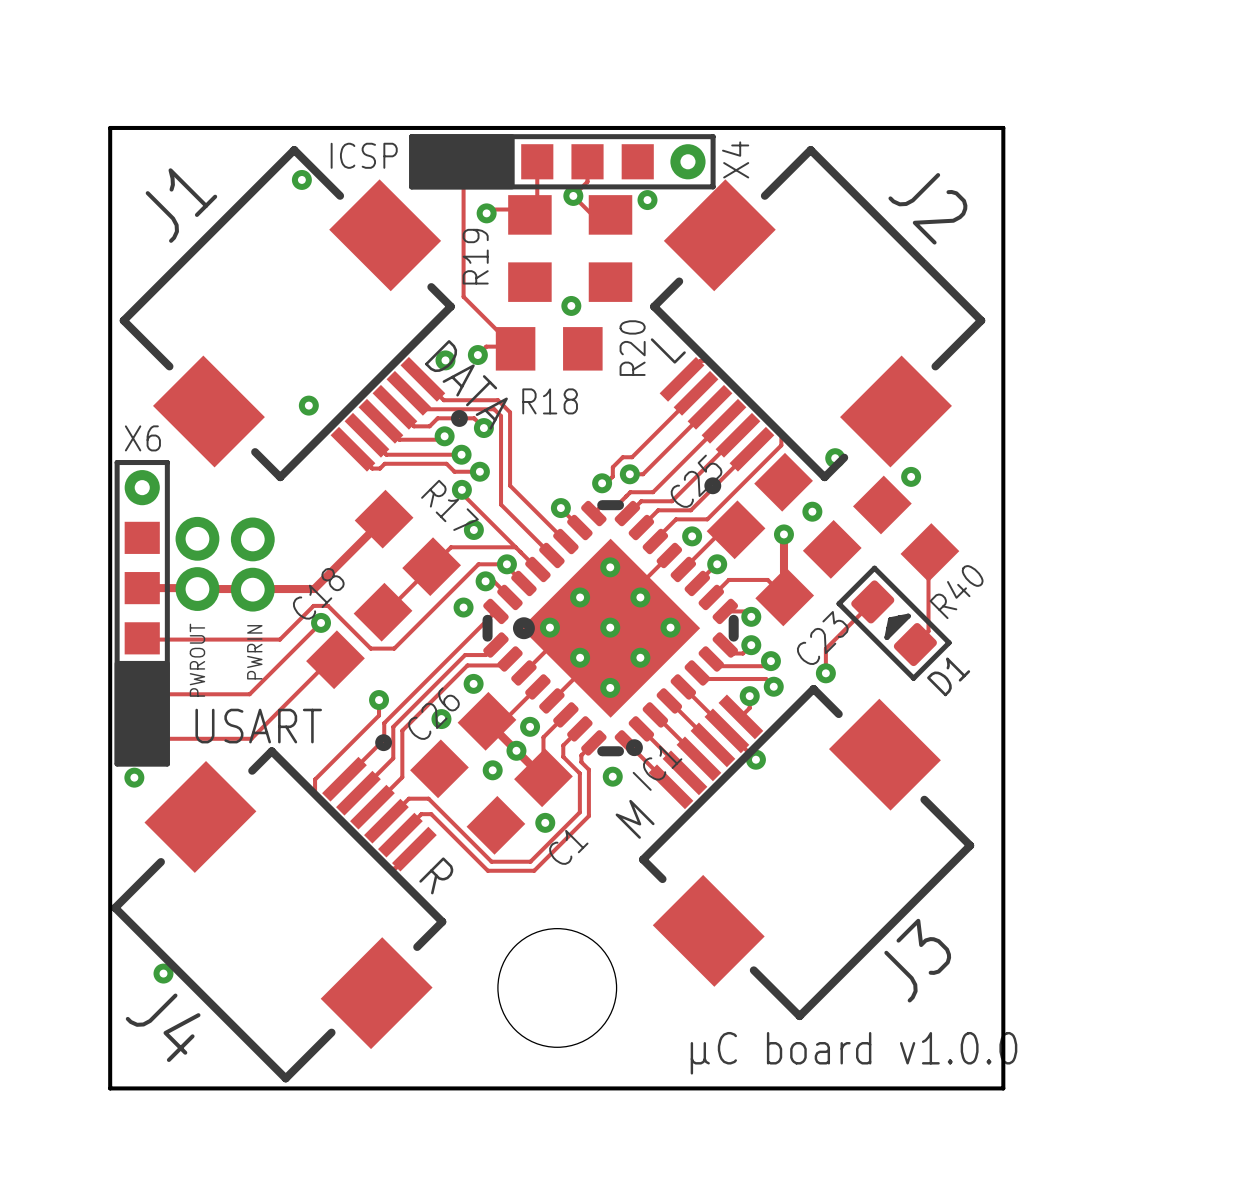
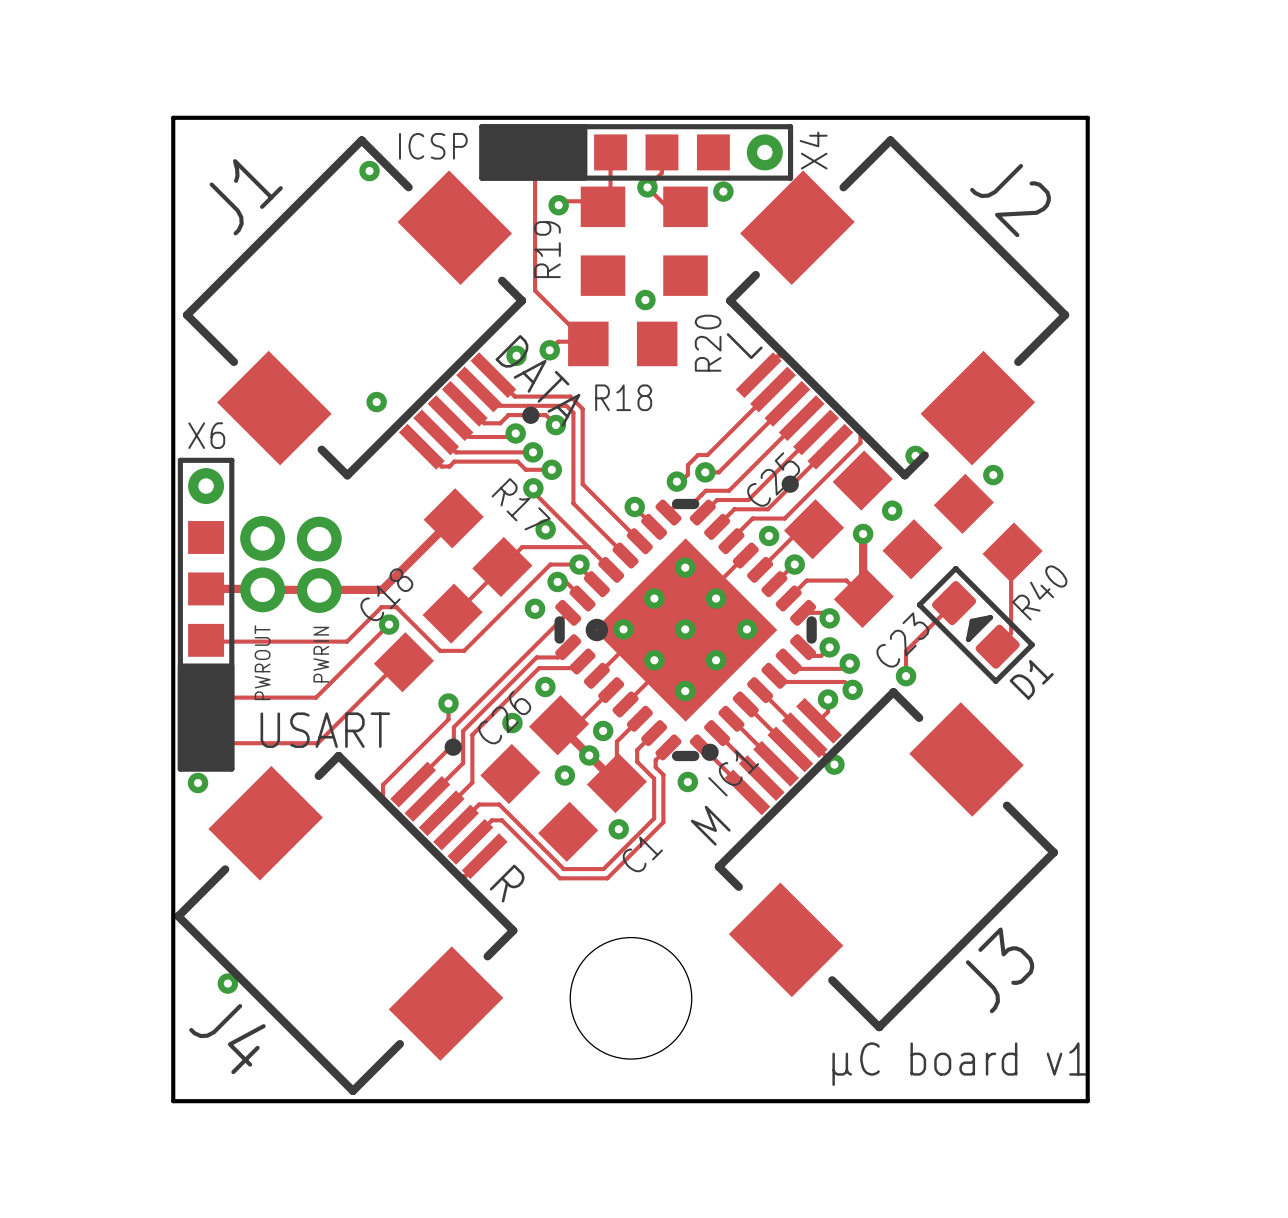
text: µC board v1.0.0 (853, 1053) -> µC board v1 (959, 1064)

